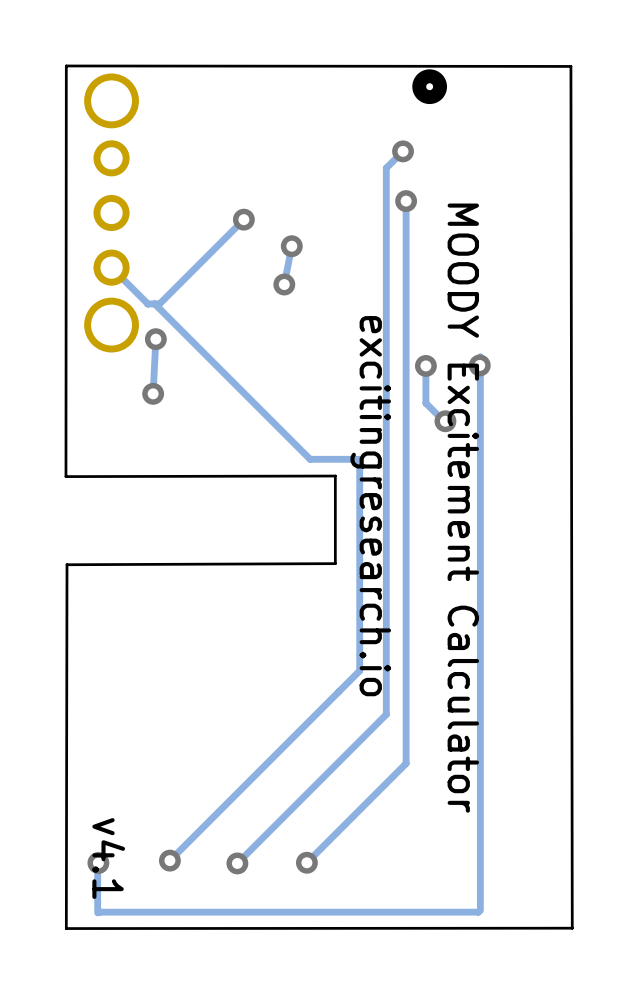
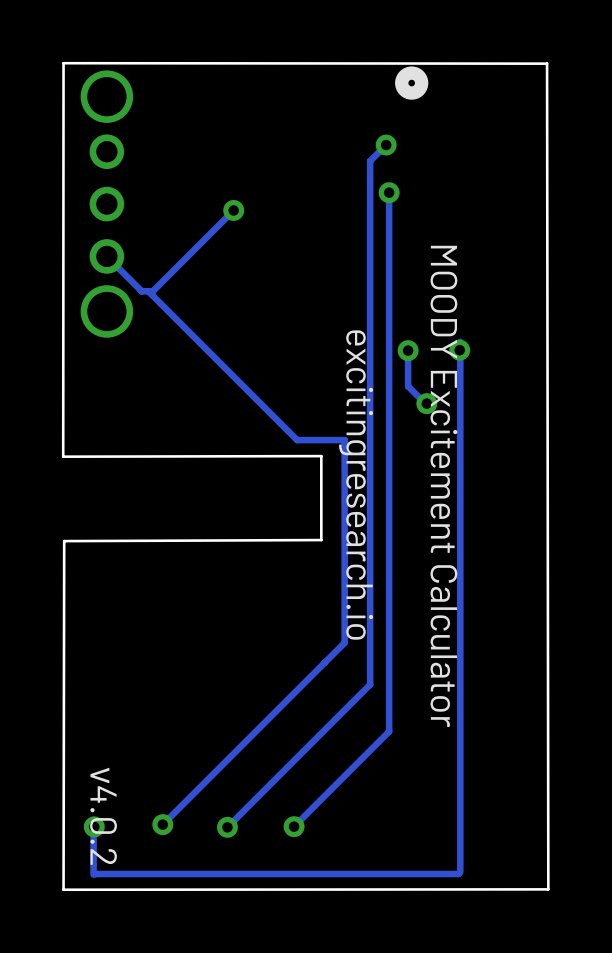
track: (291, 246) (284, 284) -> none
via: (291, 246) -> none
via: (284, 284) -> none
track: (155, 339) (153, 393) -> none
via: (155, 339) -> none
via: (153, 393) -> none
text: v4.1 (108, 858) -> v4.0.2 (103, 816)

